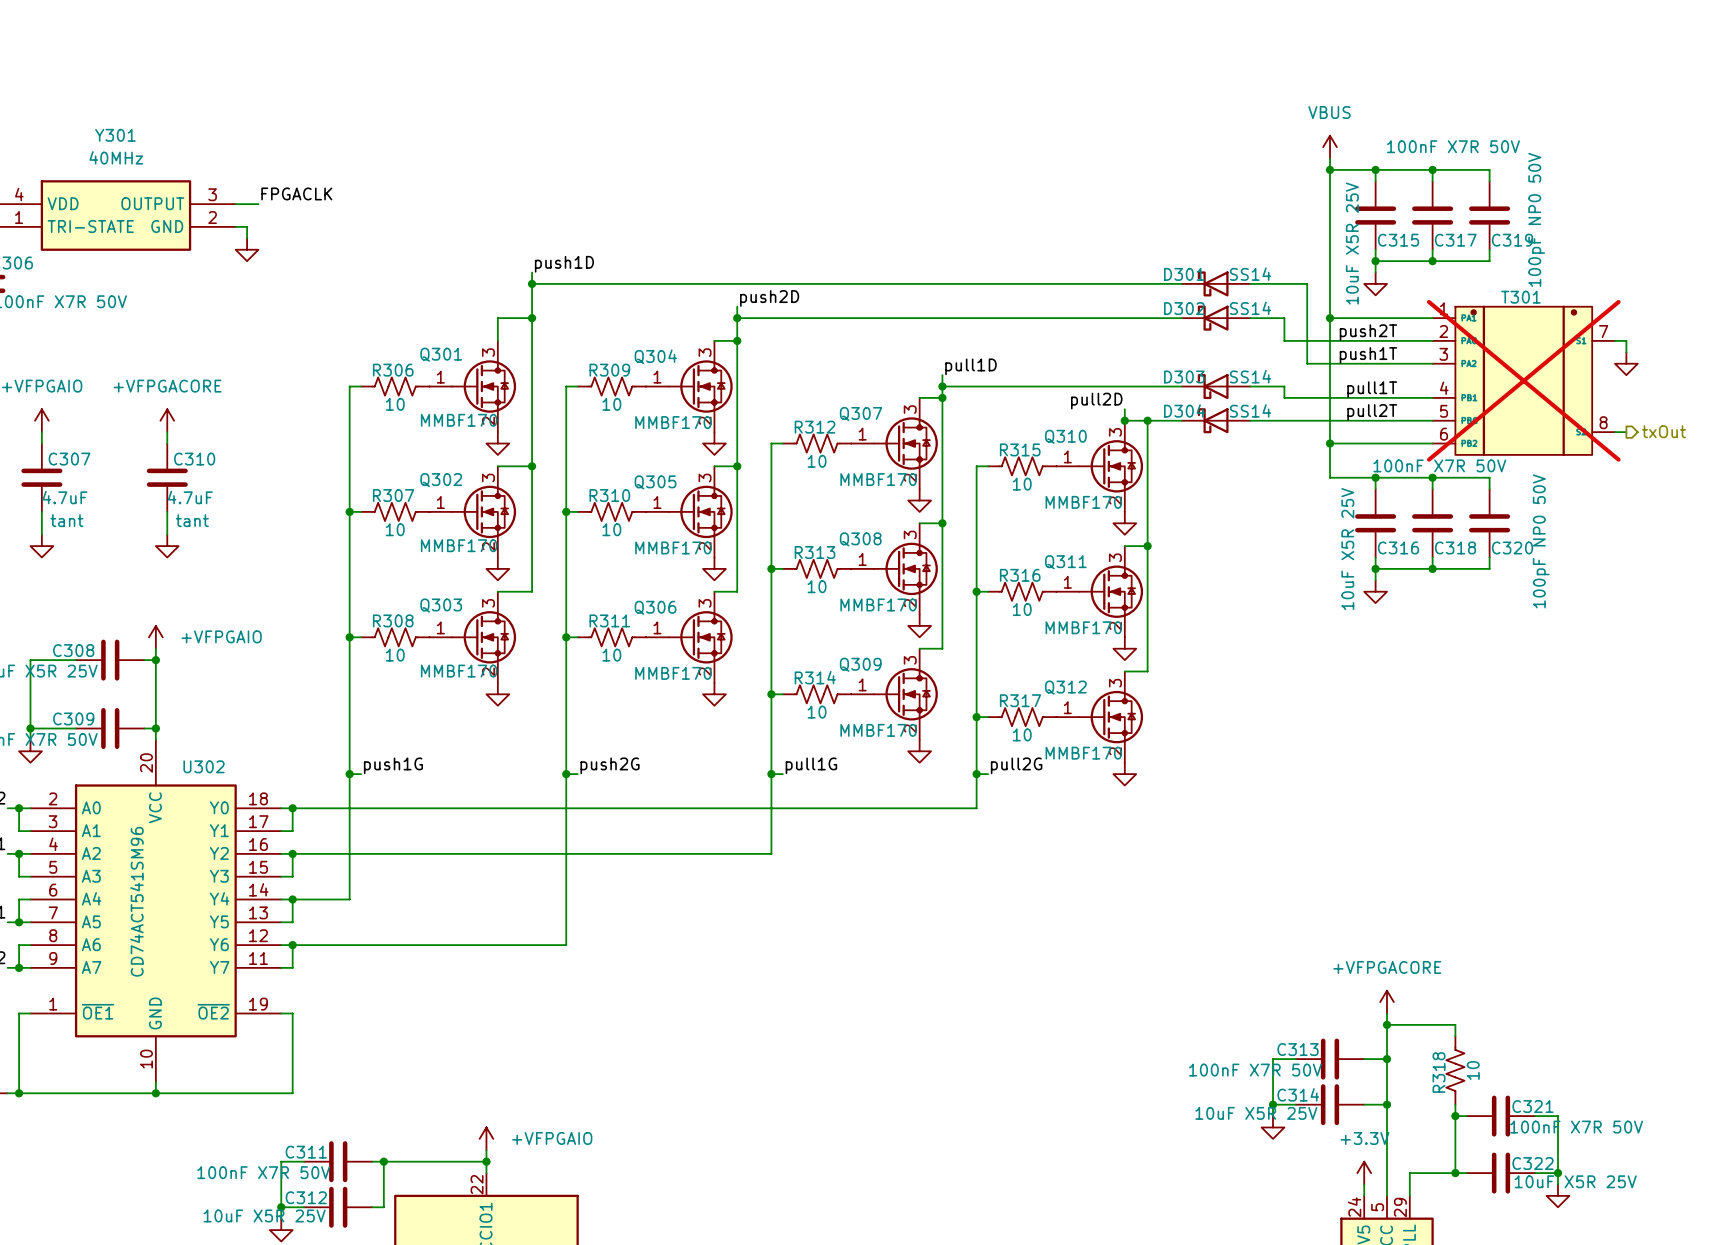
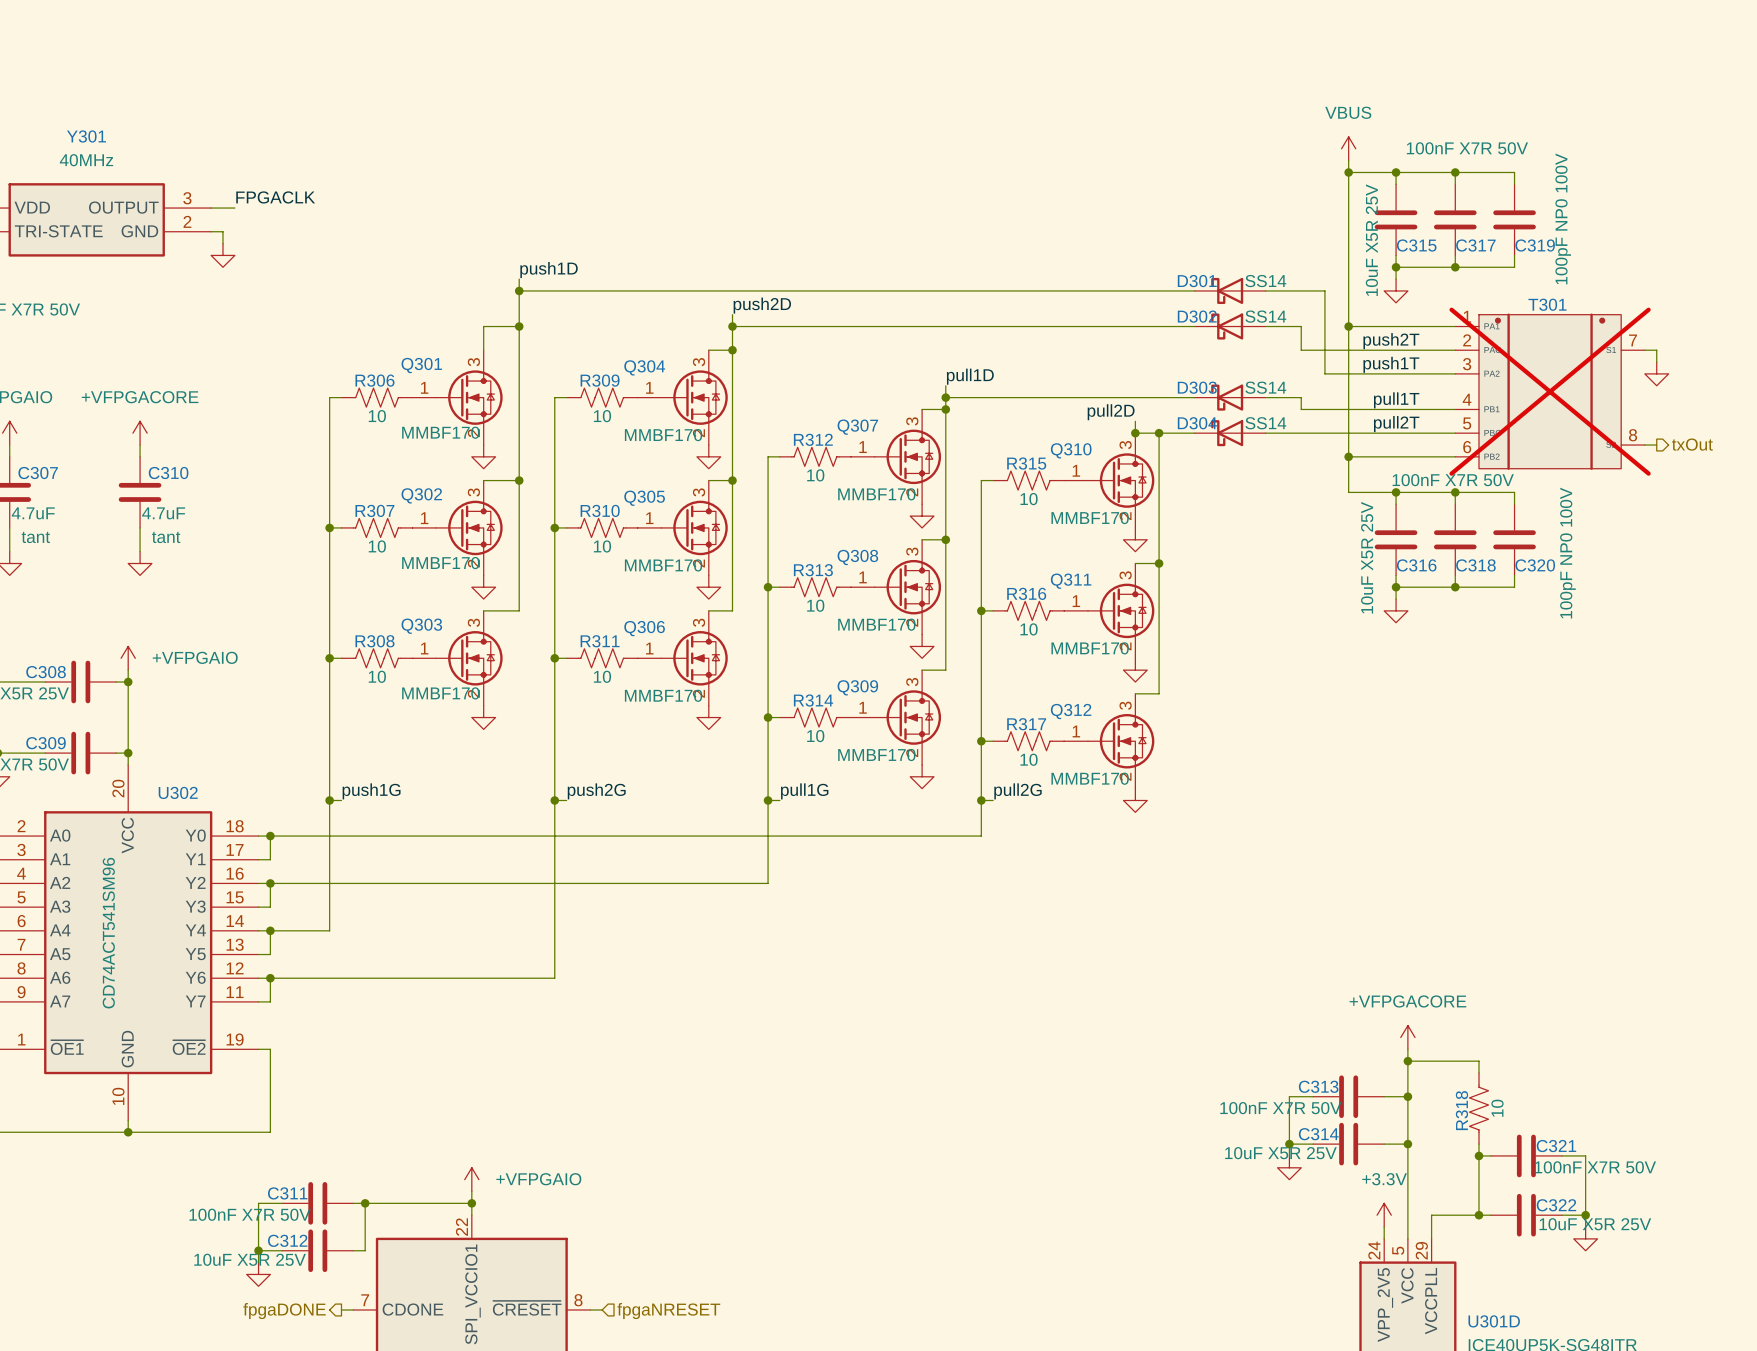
C319 value: 100pF NP0 50V (1536, 219) -> 100pF NP0 100V (1563, 218)
C320 value: 100pF NP0 50V (1541, 541) -> 100pF NP0 100V (1567, 553)

